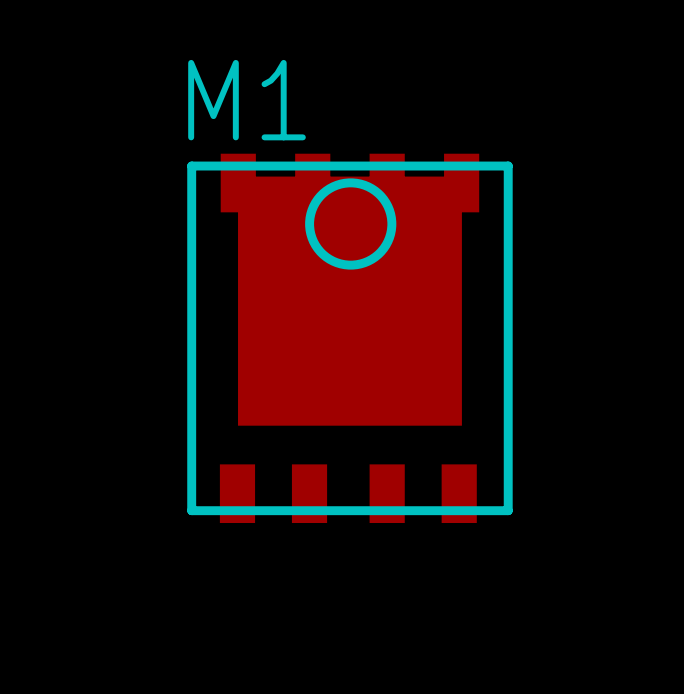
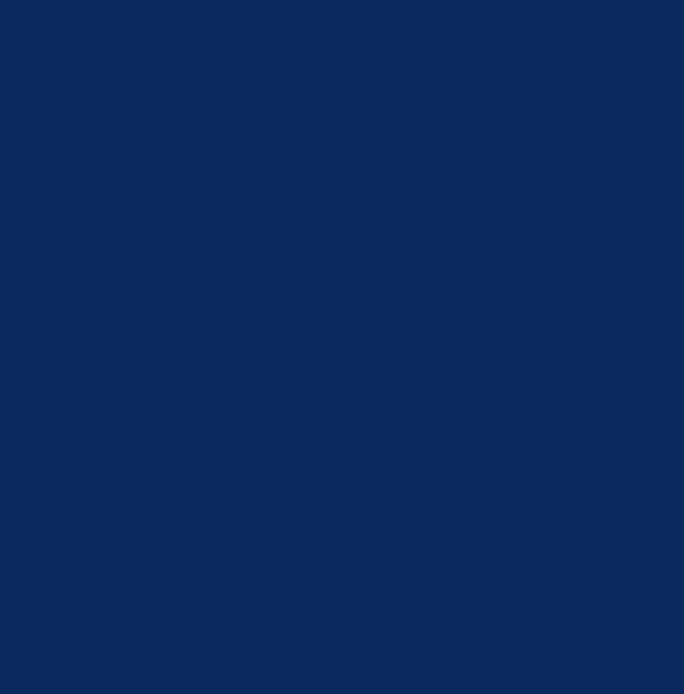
M1: (349, 338) -> none

